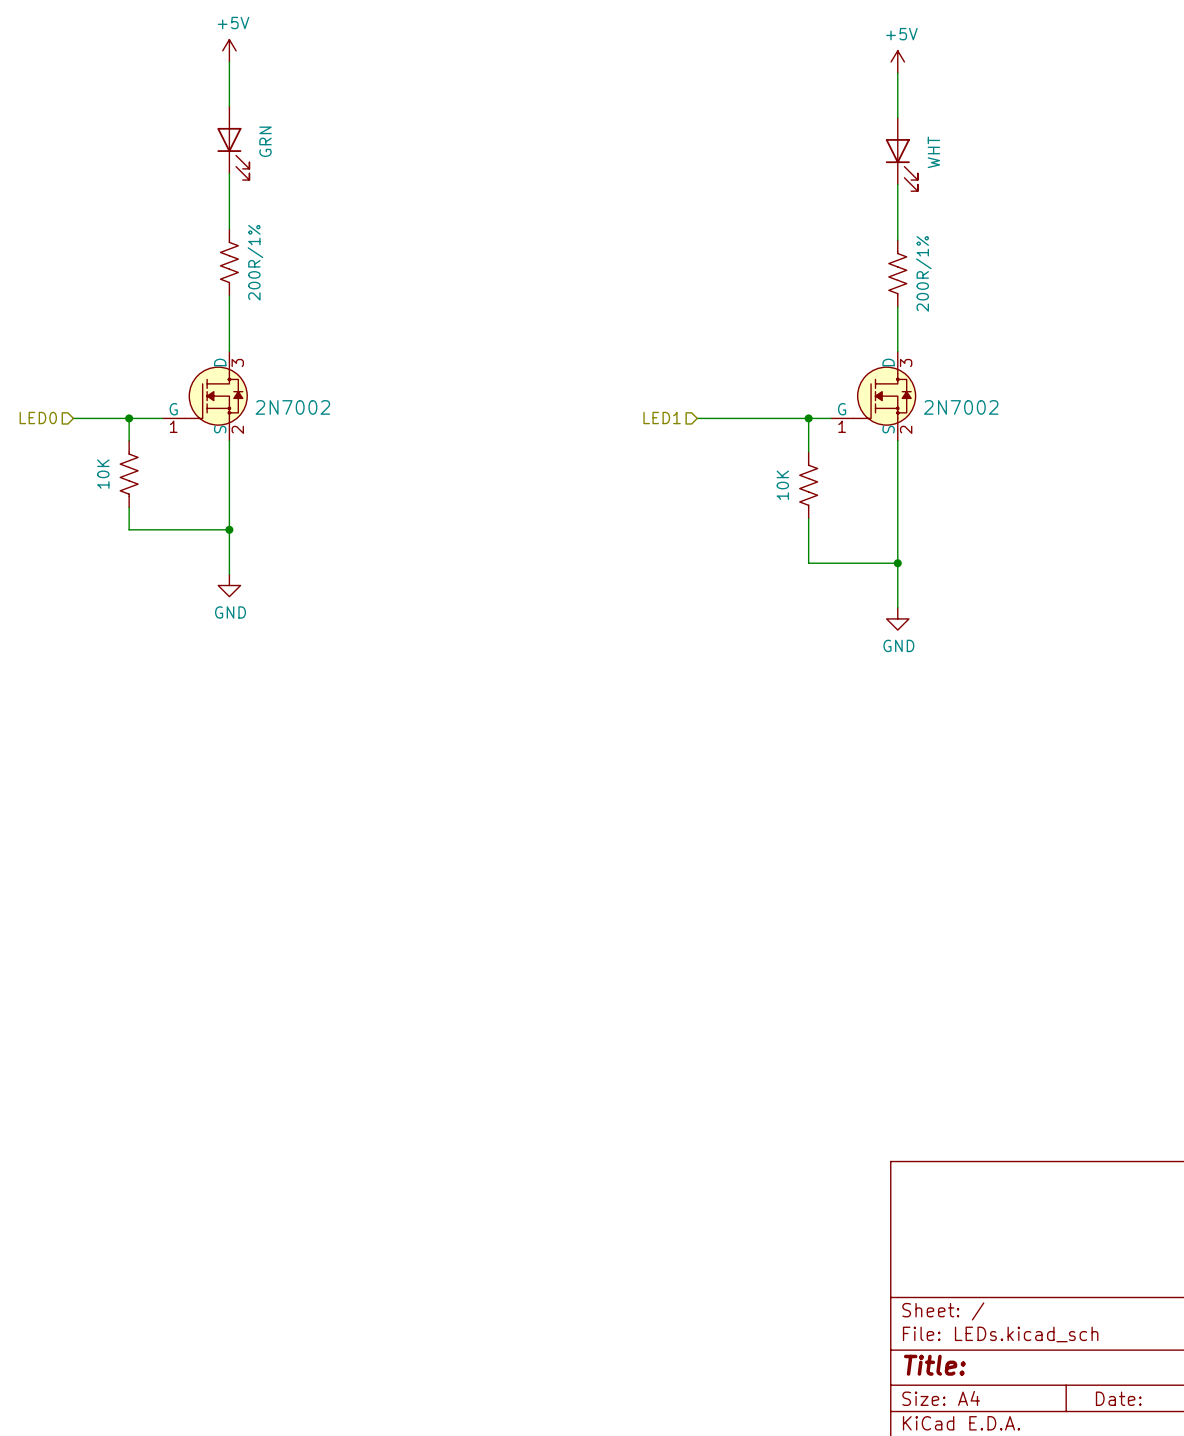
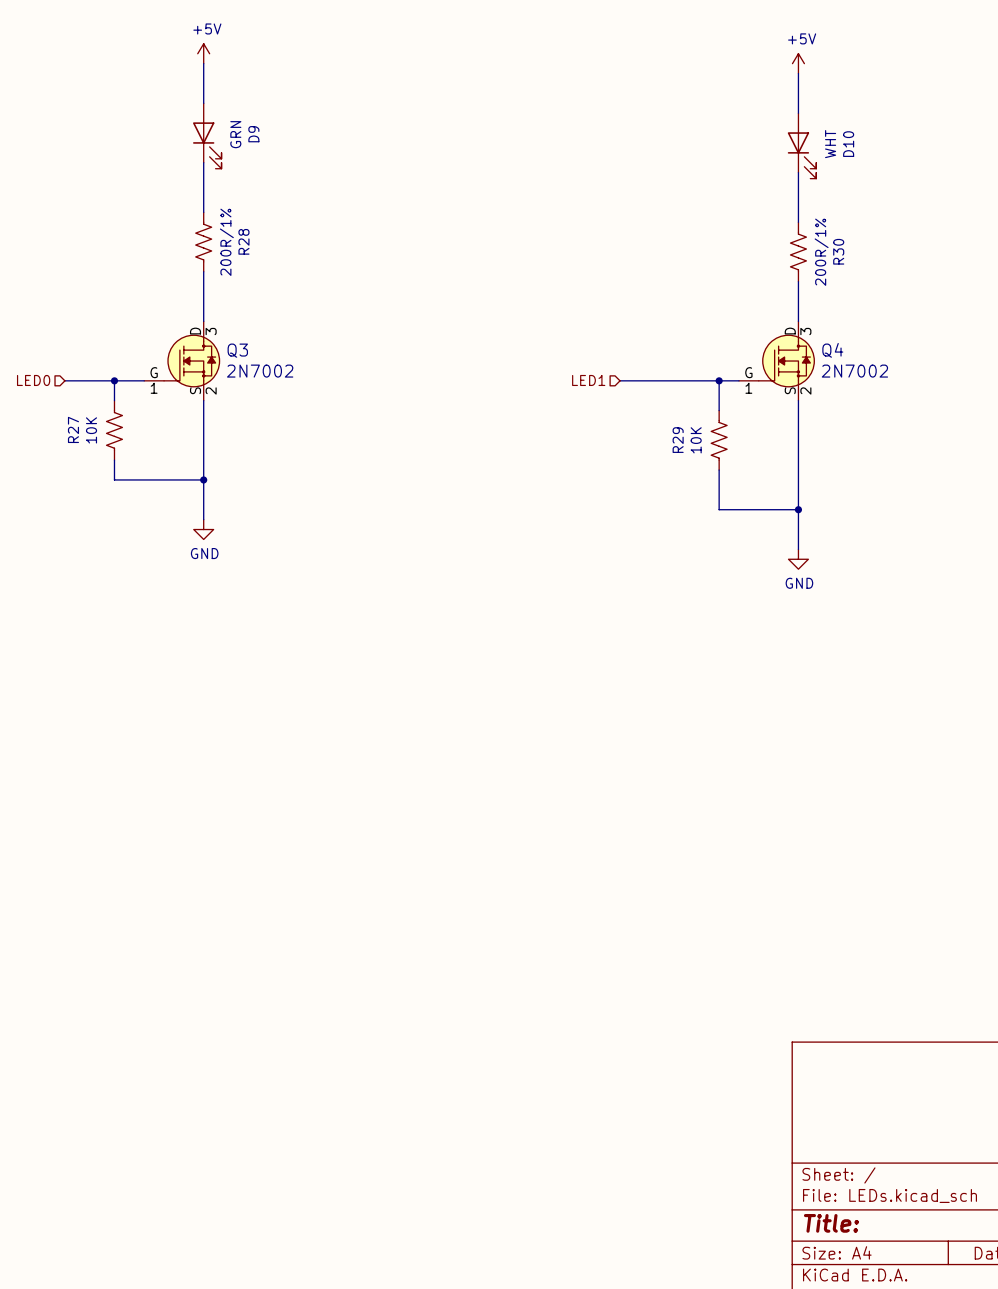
D9 name: none -> D9 (253, 134)
D10 name: none -> D10 (848, 144)
R28 name: none -> R28 (243, 241)
R30 name: none -> R30 (838, 251)
Q3 name: none -> Q3 (237, 350)
Q4 name: none -> Q4 (832, 350)
R27 name: none -> R27 (73, 429)
R29 name: none -> R29 (678, 440)

